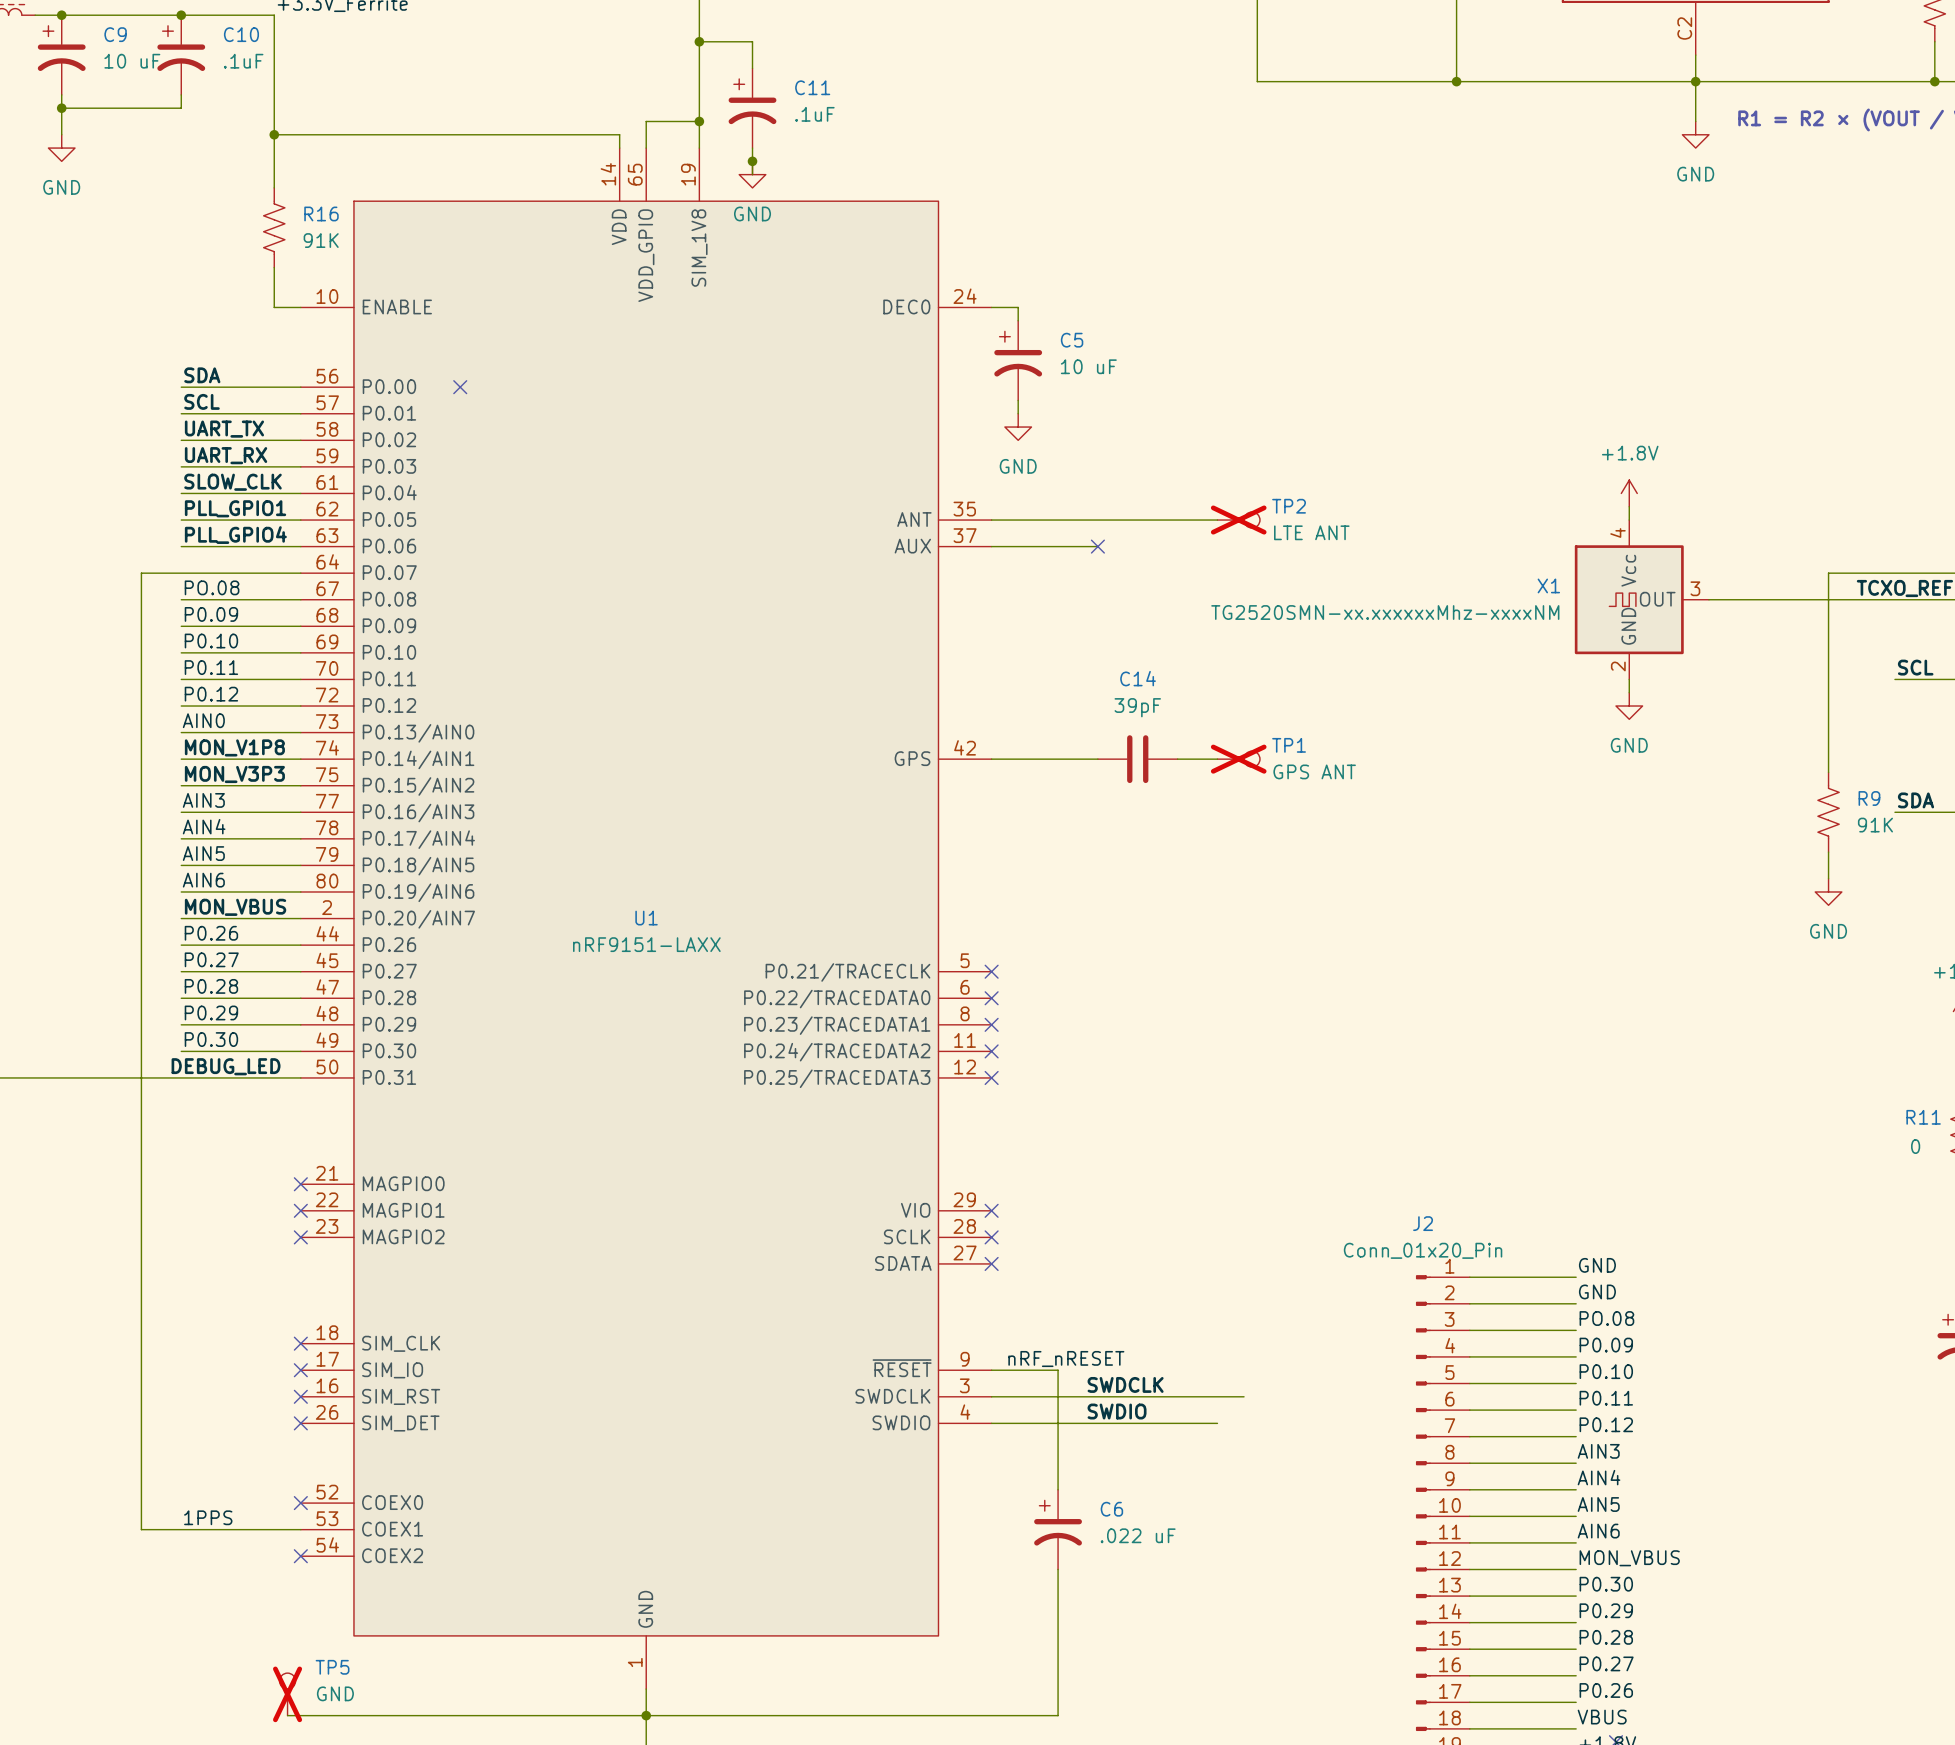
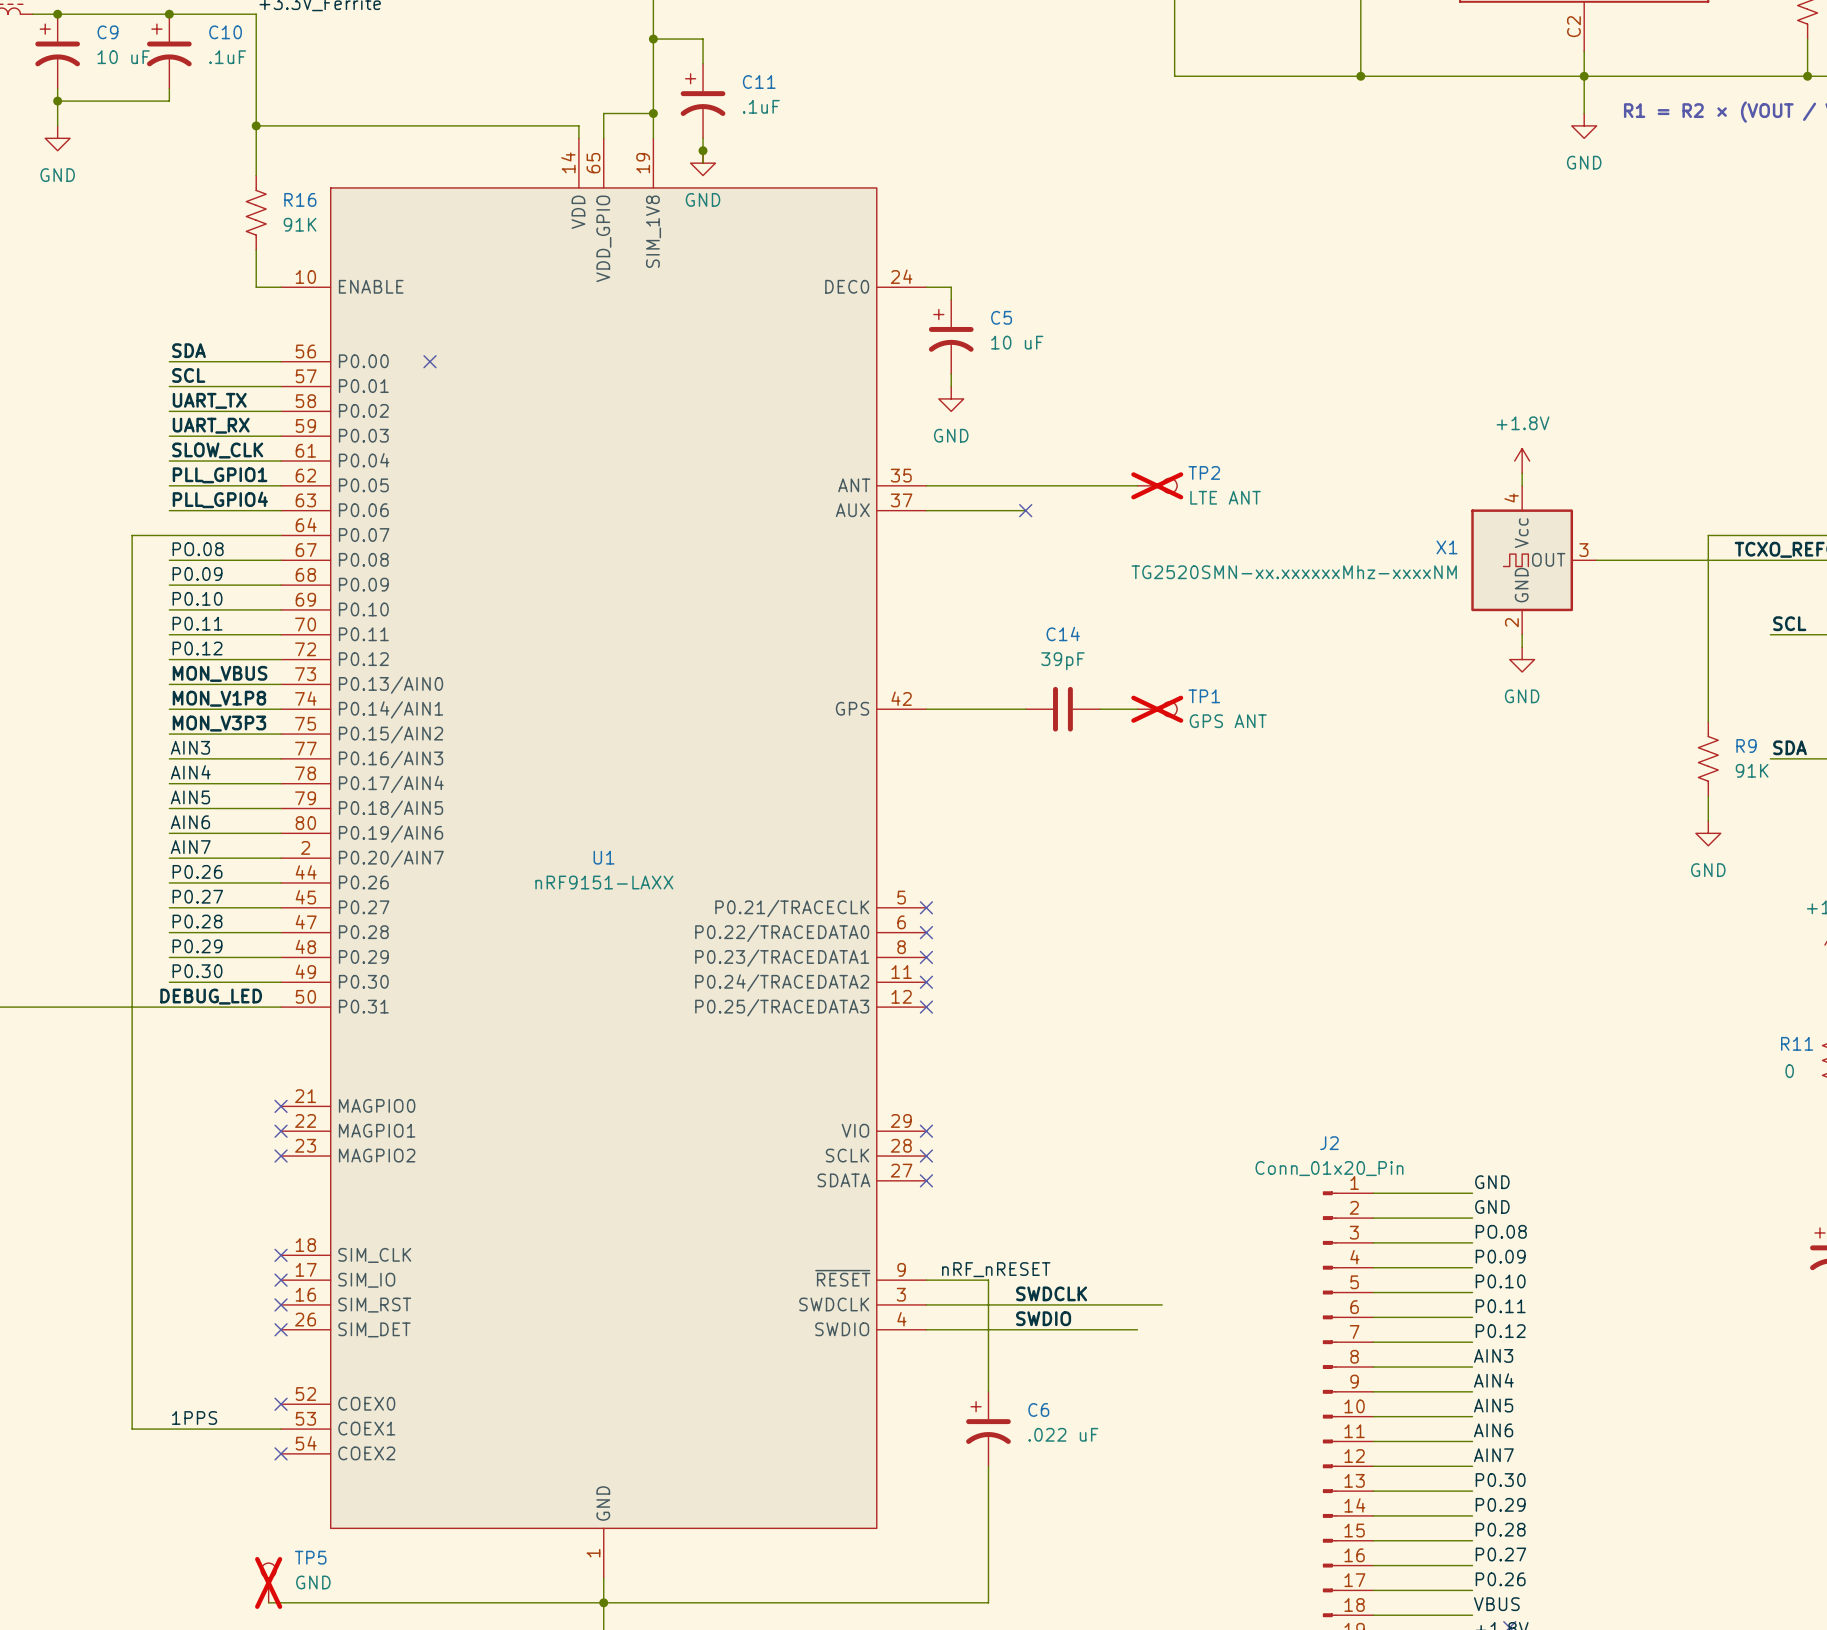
label: AIN0 (203, 720) -> MON_VBUS (220, 673)
label: MON_VBUS (235, 907) -> AIN7 (190, 847)
label: MON_VBUS (1629, 1558) -> AIN7 (1493, 1455)

